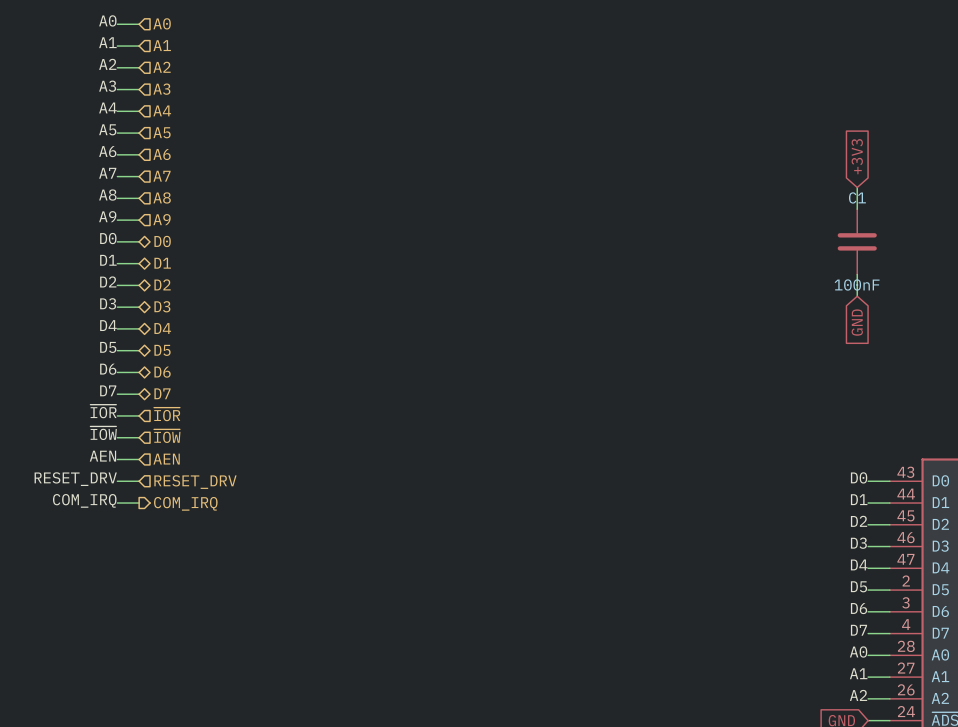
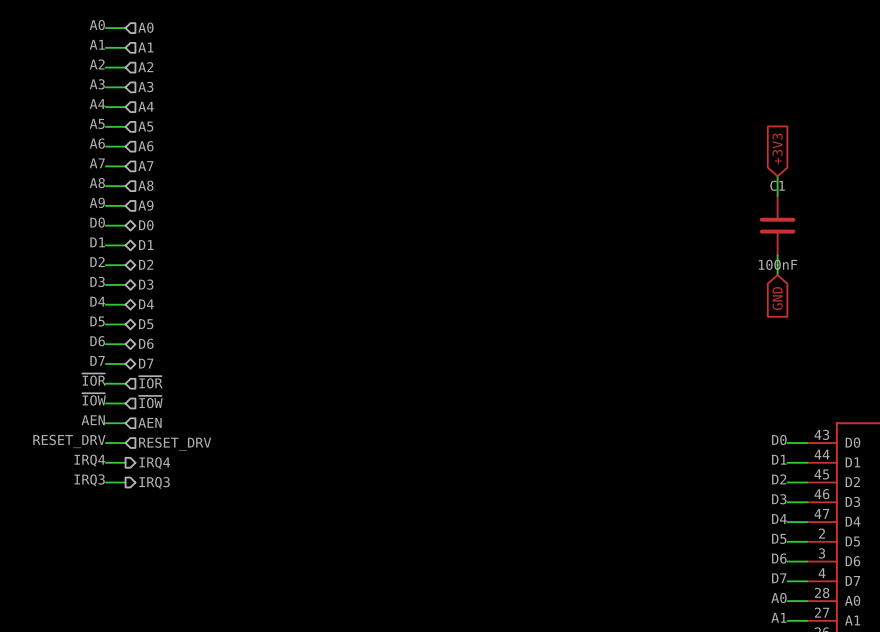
label: COM_IRQ (84, 500) -> IRQ4 (89, 460)
hierarchical label: COM_IRQ (185, 503) -> IRQ4 (154, 463)
label: none -> IRQ3 (89, 480)
wire: none -> (105, 482) (125, 482)
hierarchical label: none -> IRQ3 (154, 482)

